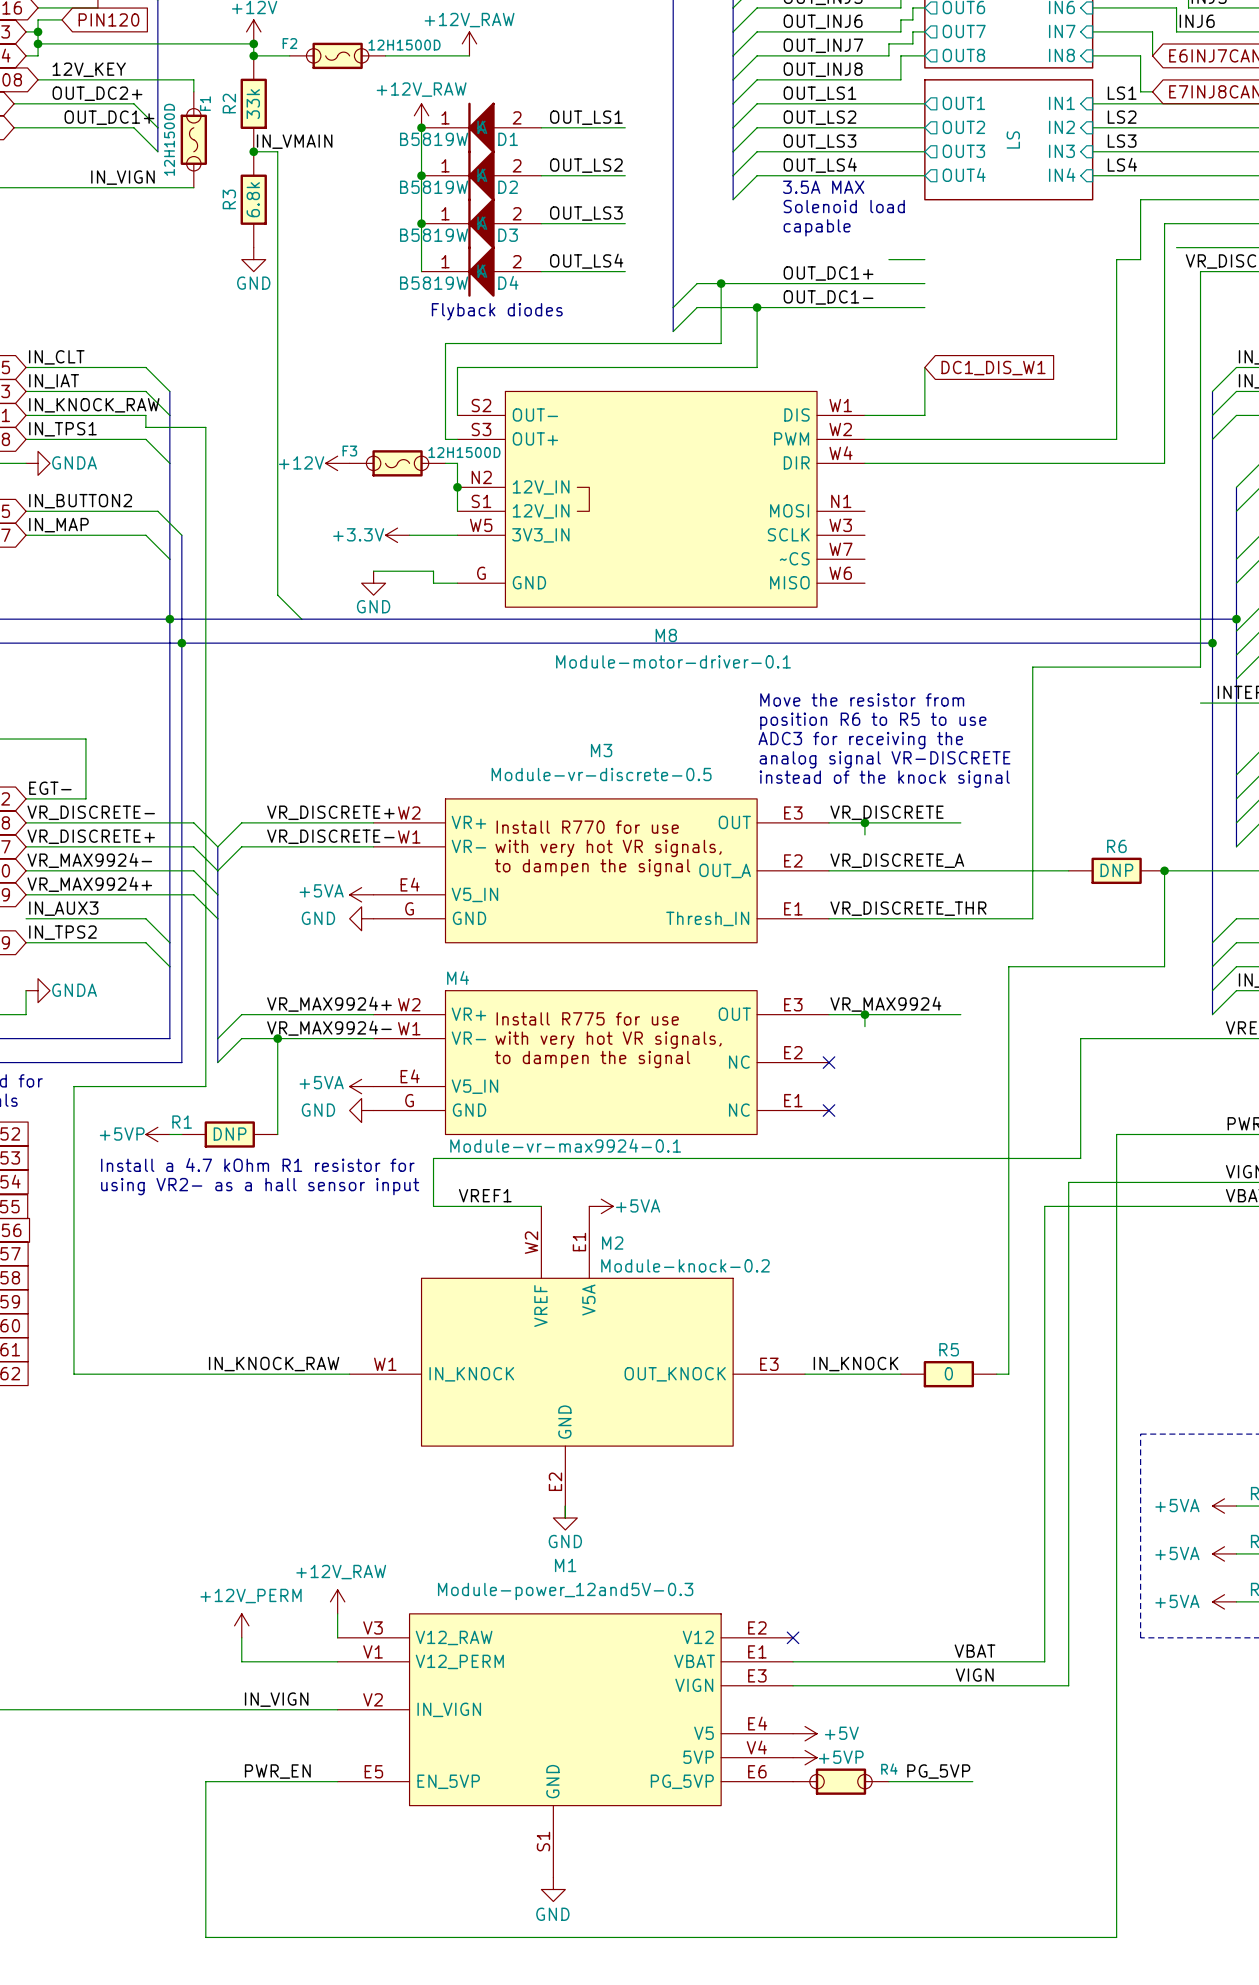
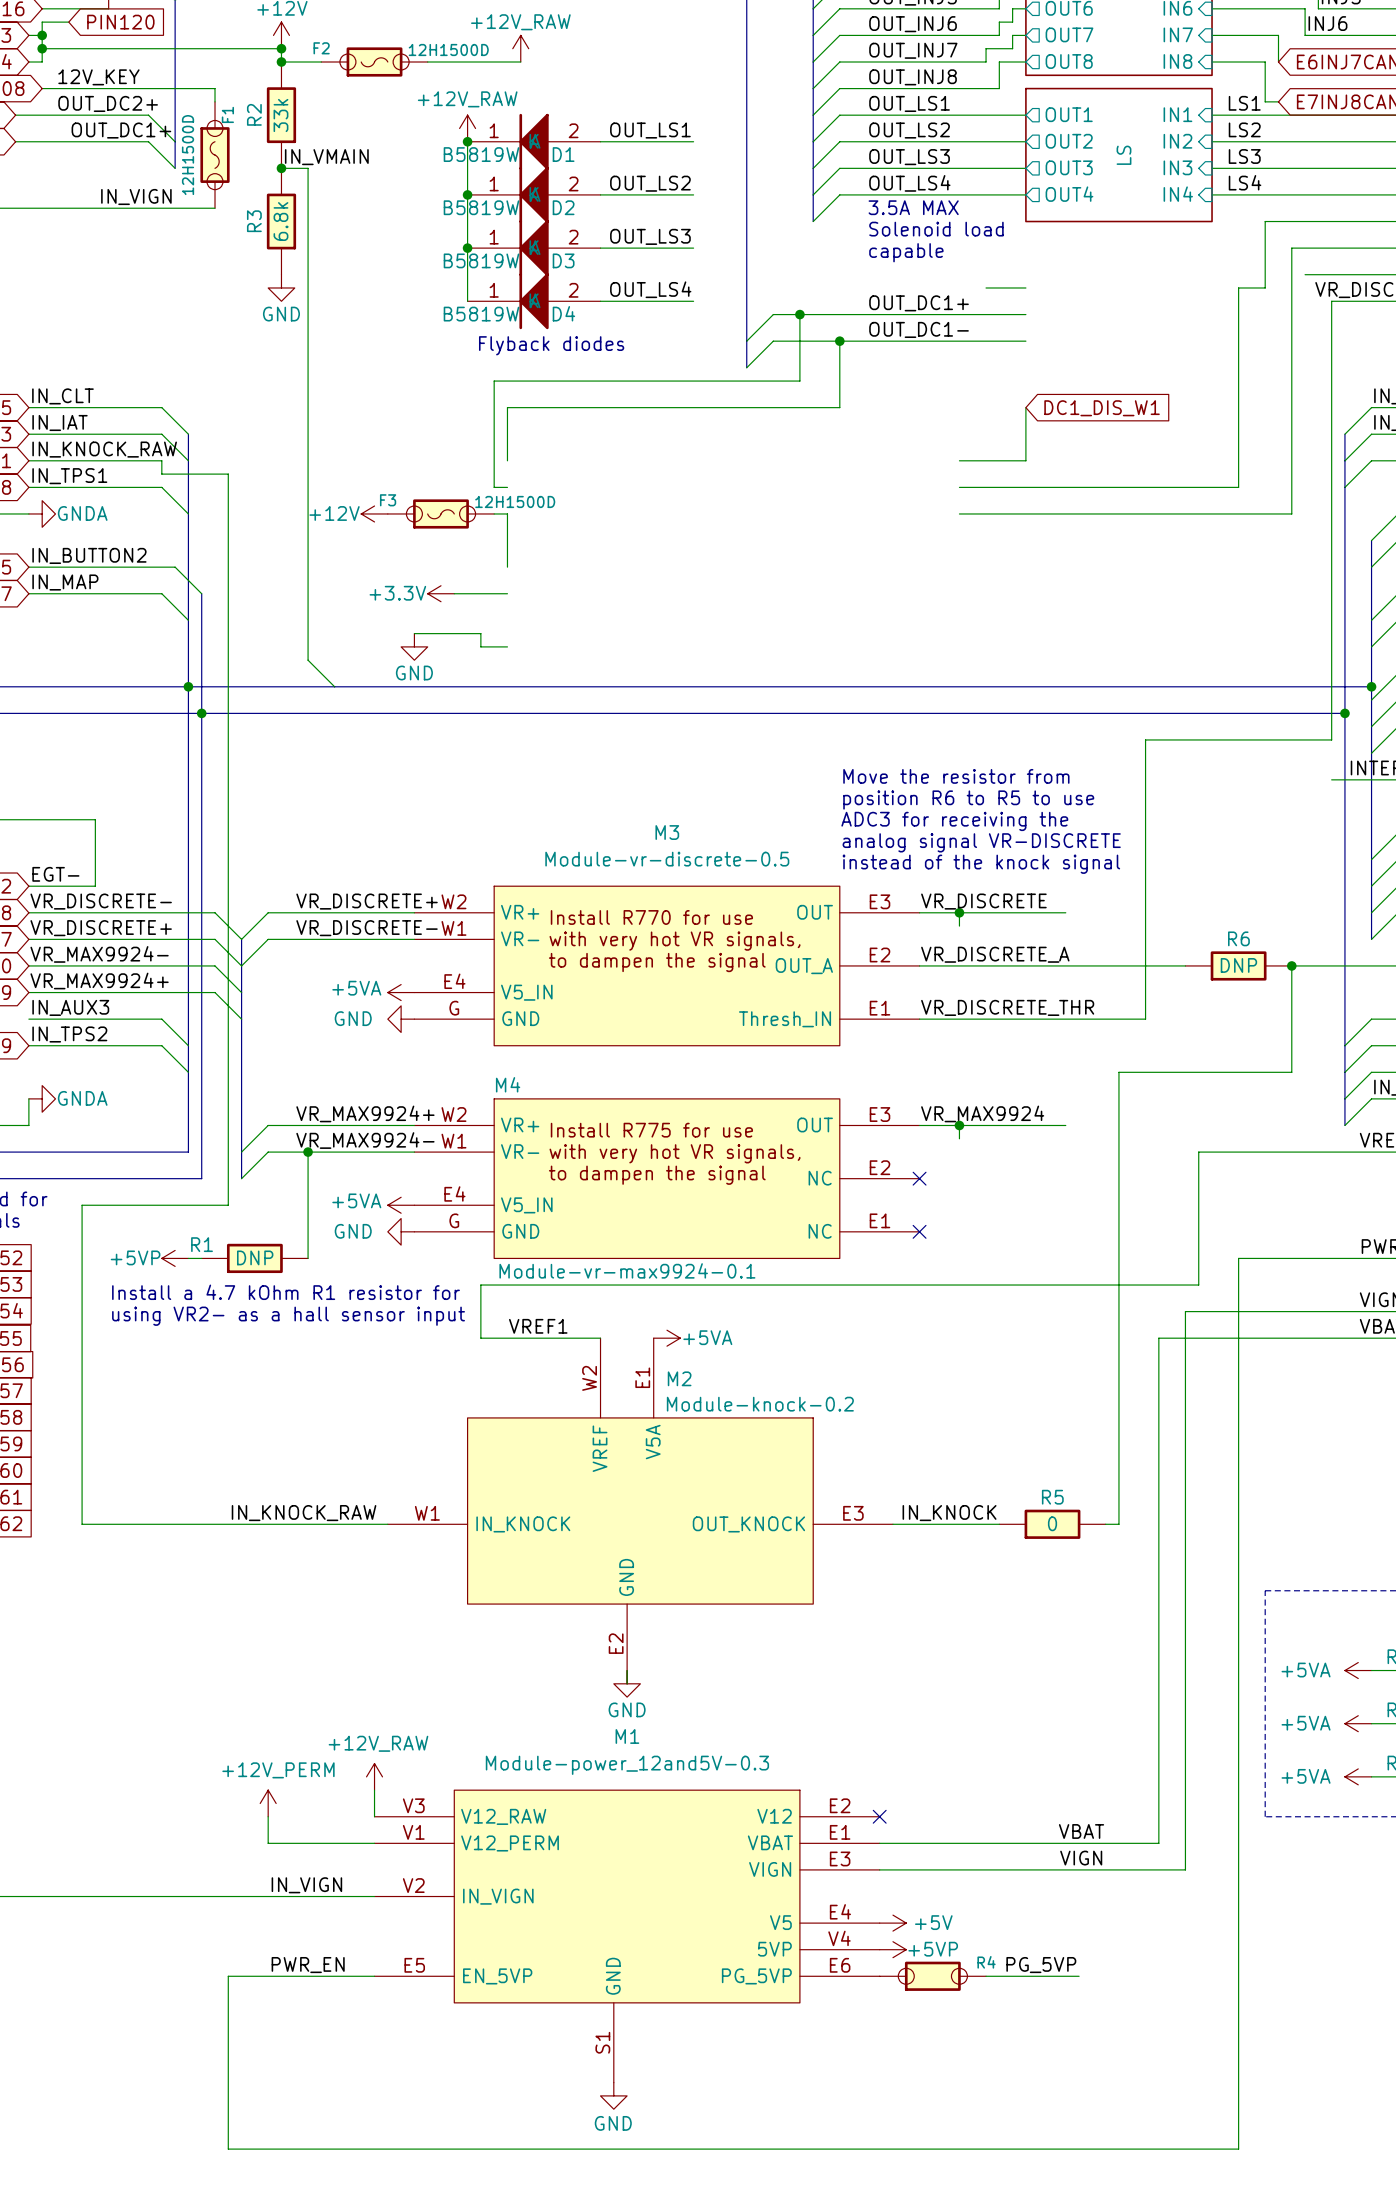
junction: (457, 487) -> none
M8: Module-motor-driver-0.1 (661, 499) -> none

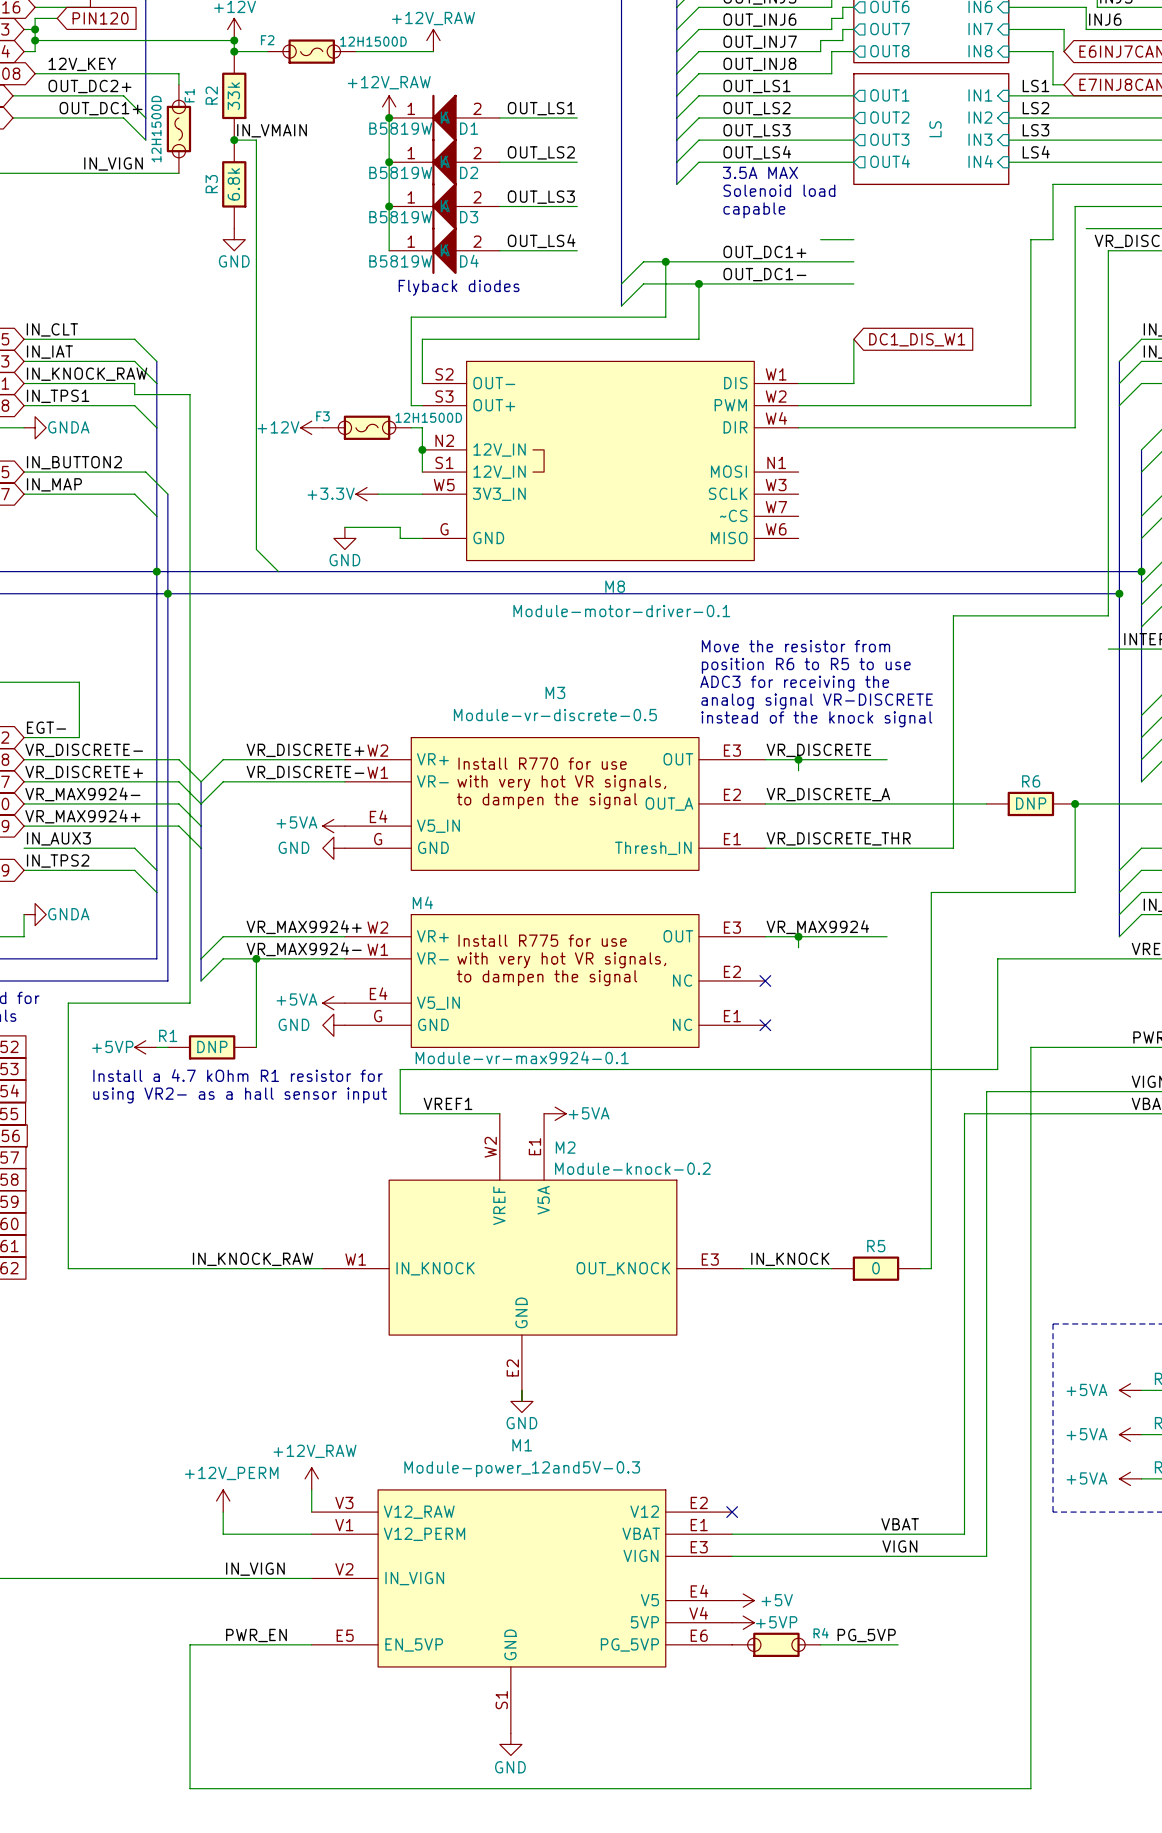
junction: none -> (422, 449)
M8: none -> Module-motor-driver-0.1 (610, 460)

